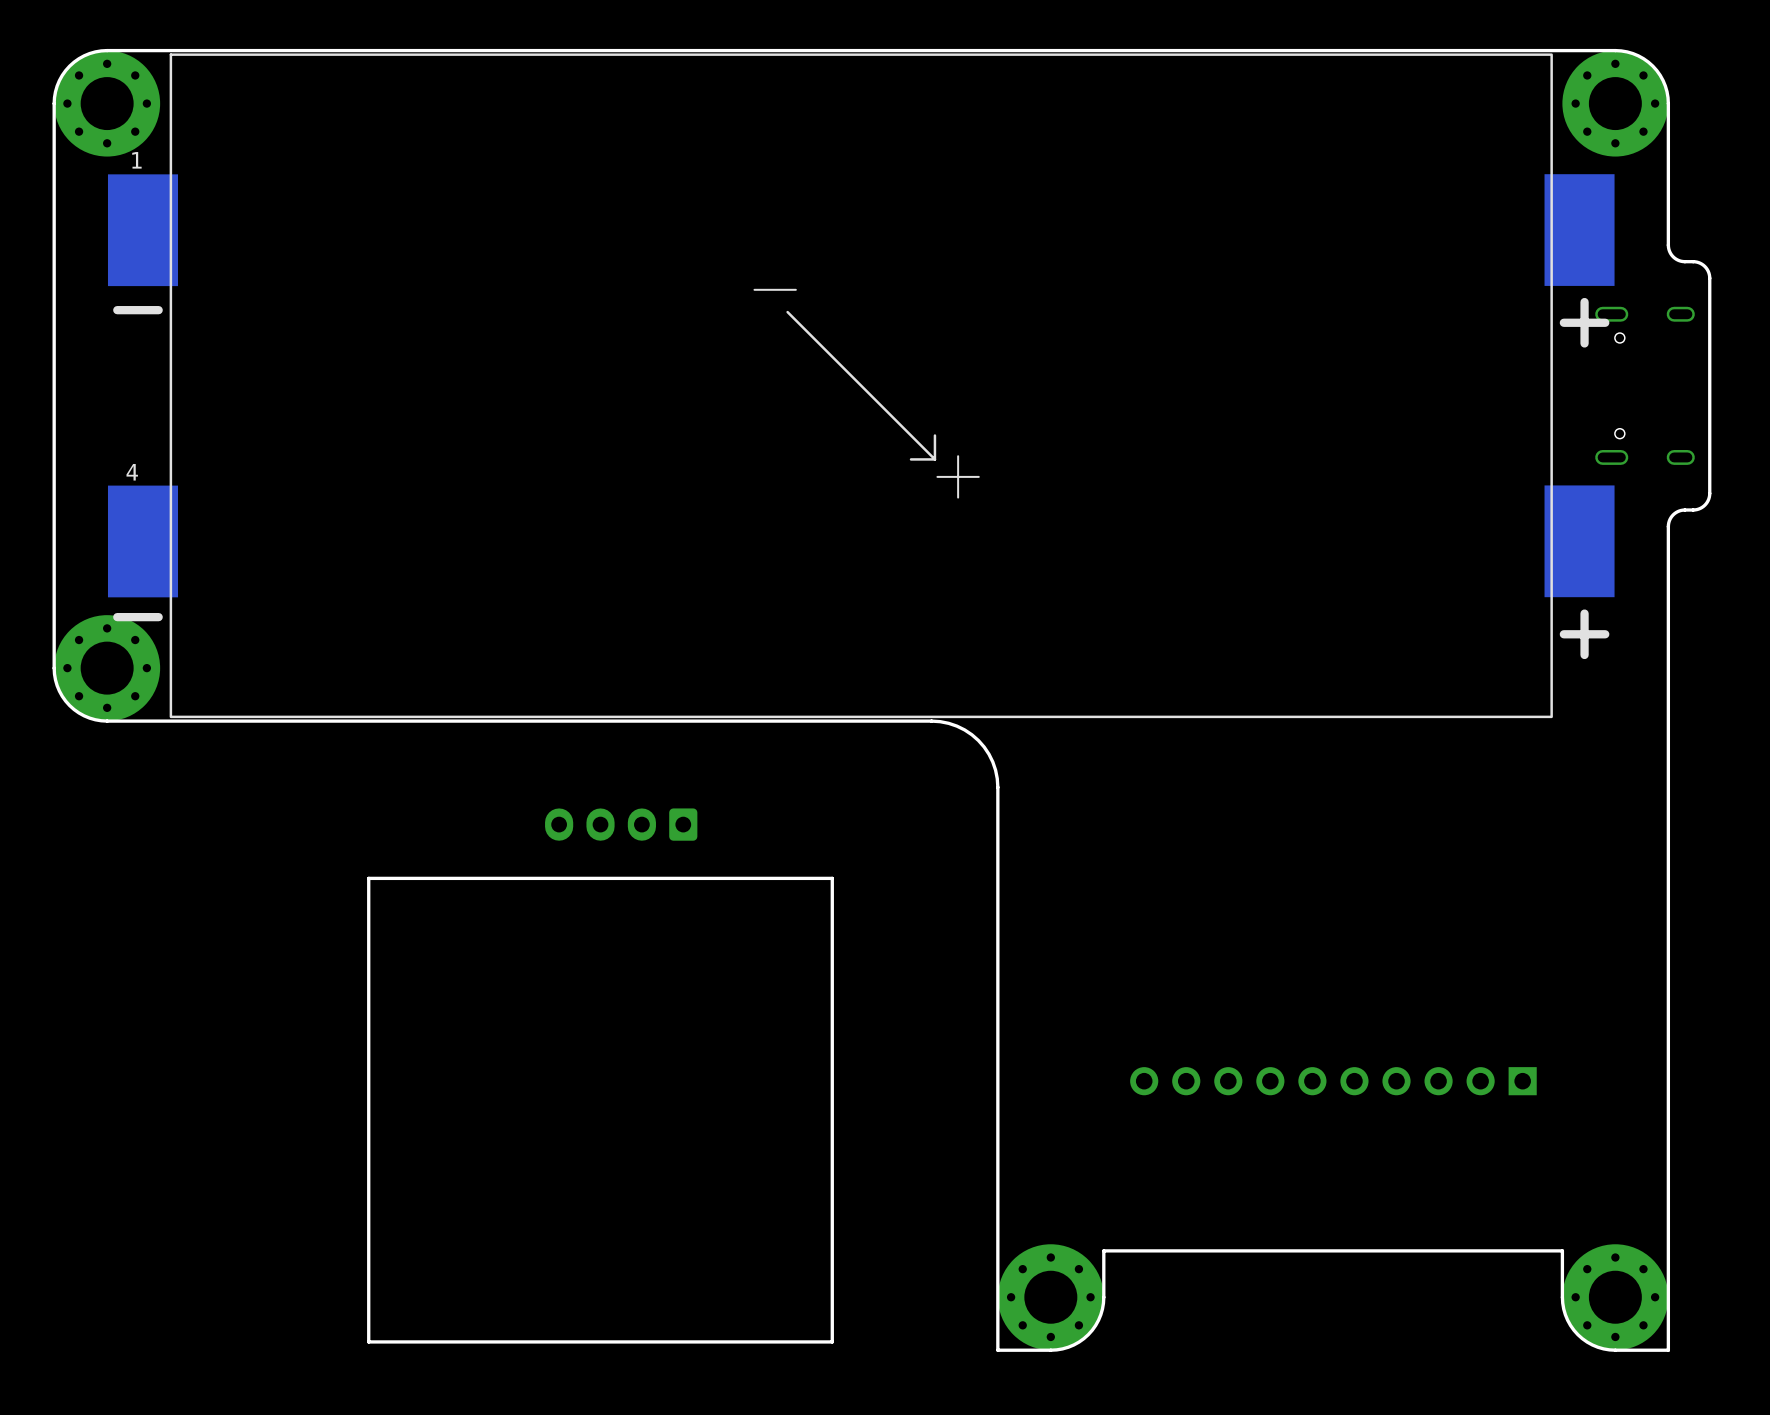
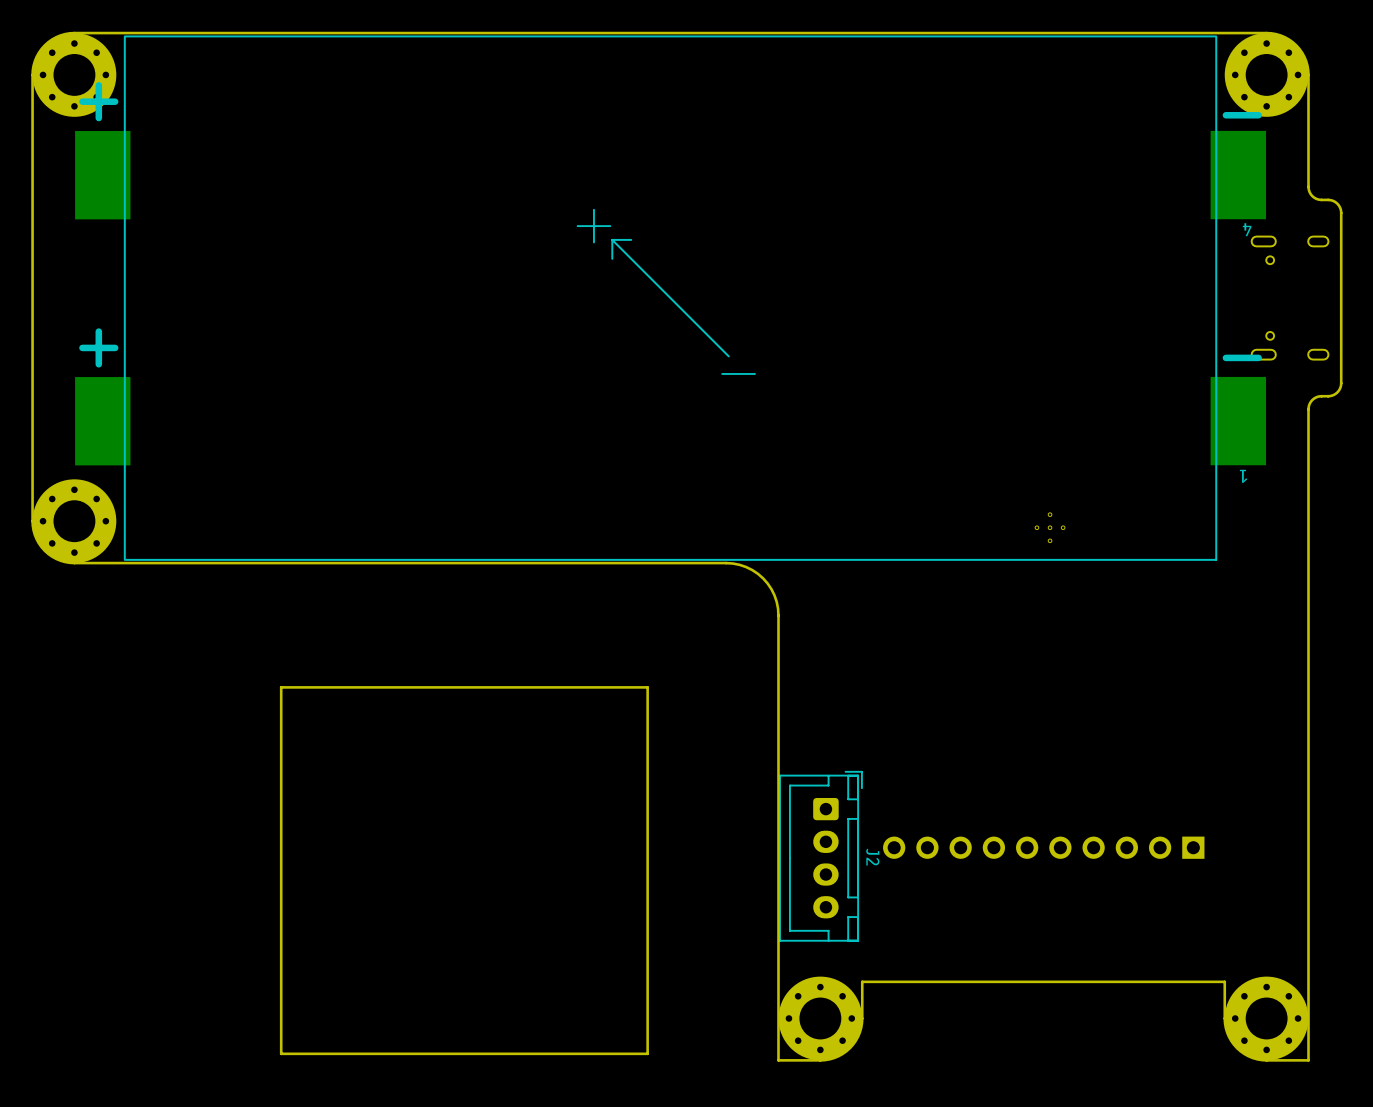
part rotation: 0° (861, 385) -> 180° (670, 298)
part: none -> (1050, 527)
part: (621, 824) -> none
J2: none -> (820, 856)

